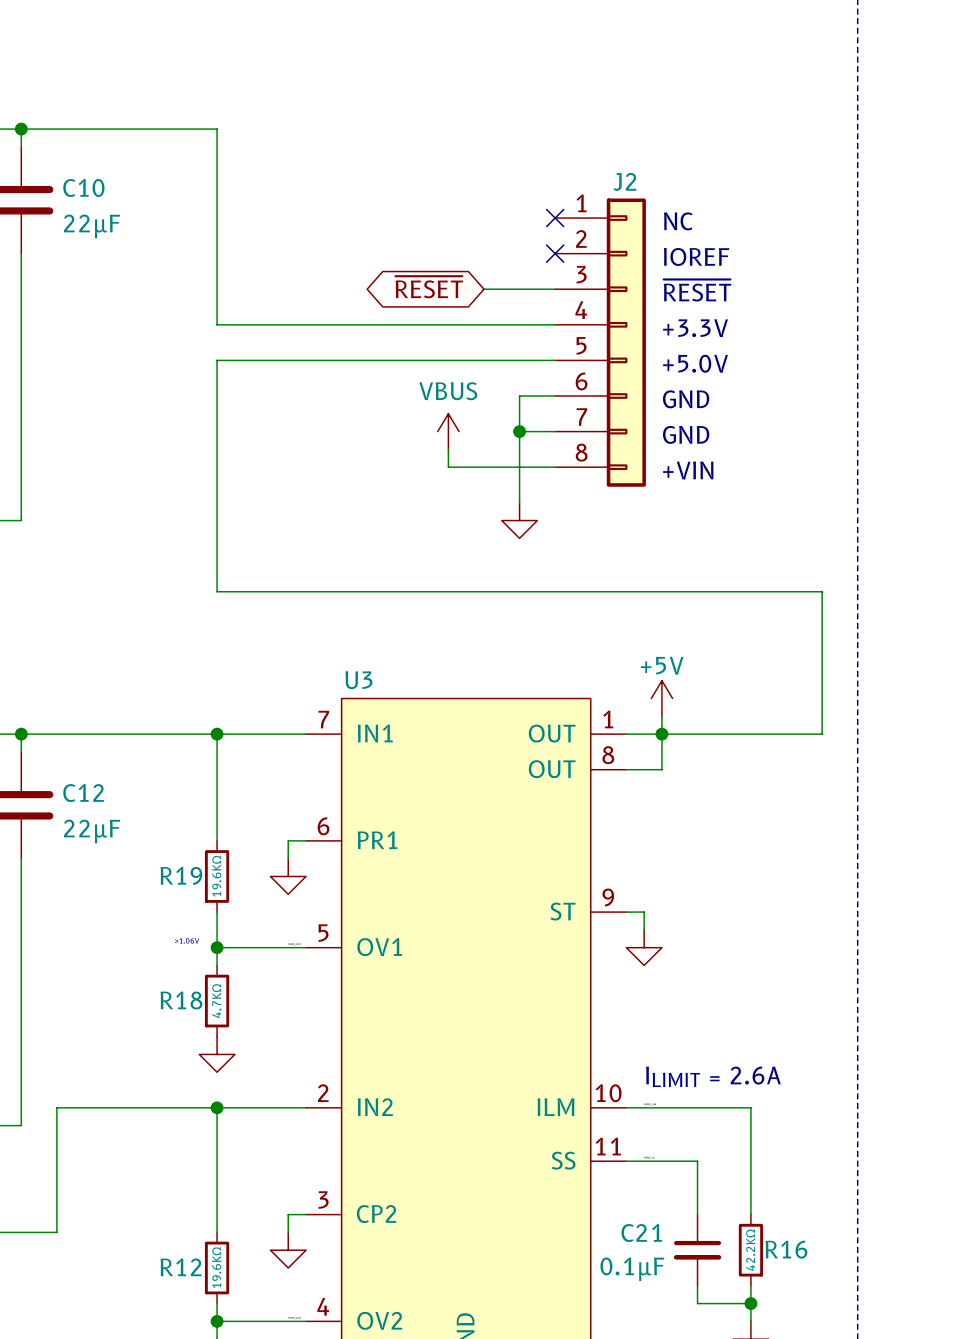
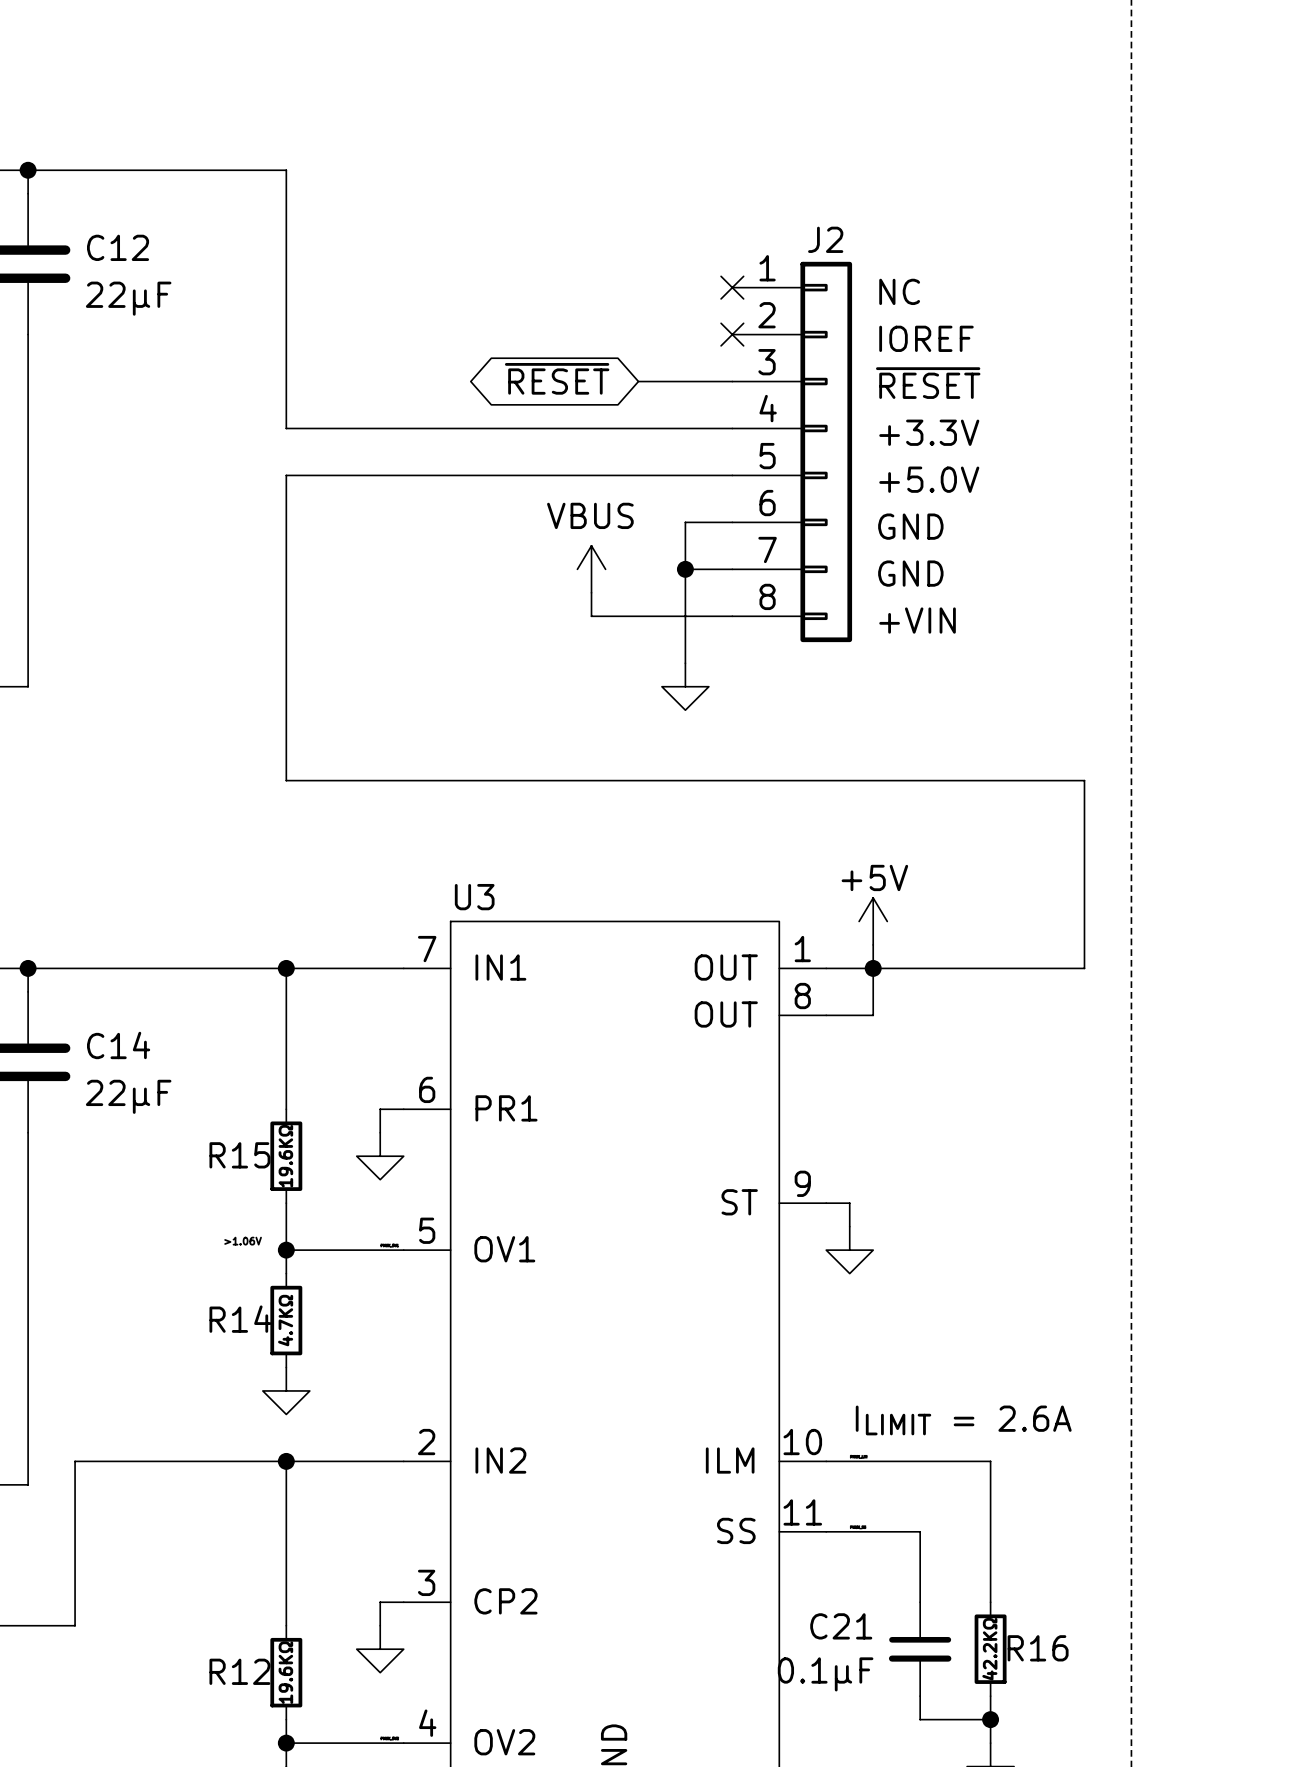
C10 name: C10 (83, 187) -> C12 (118, 247)
C12 name: C12 (83, 793) -> C14 (118, 1045)
R19 name: R19 (181, 875) -> R15 (239, 1155)
R18 name: R18 (181, 1000) -> R14 (240, 1319)

